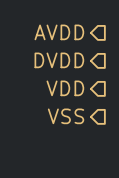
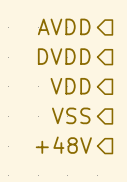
hierarchical label: none -> +48V (63, 145)

